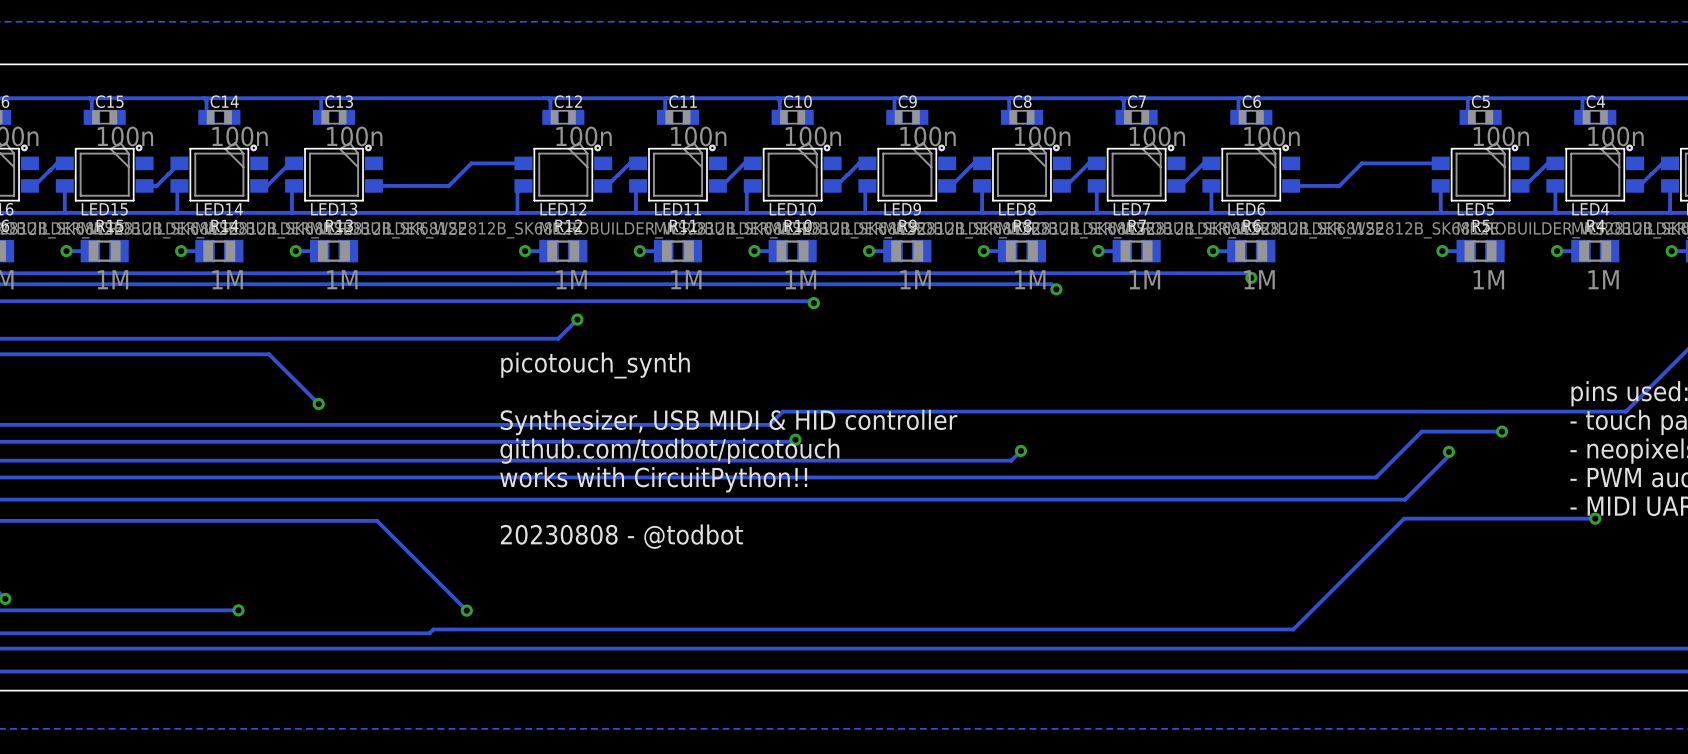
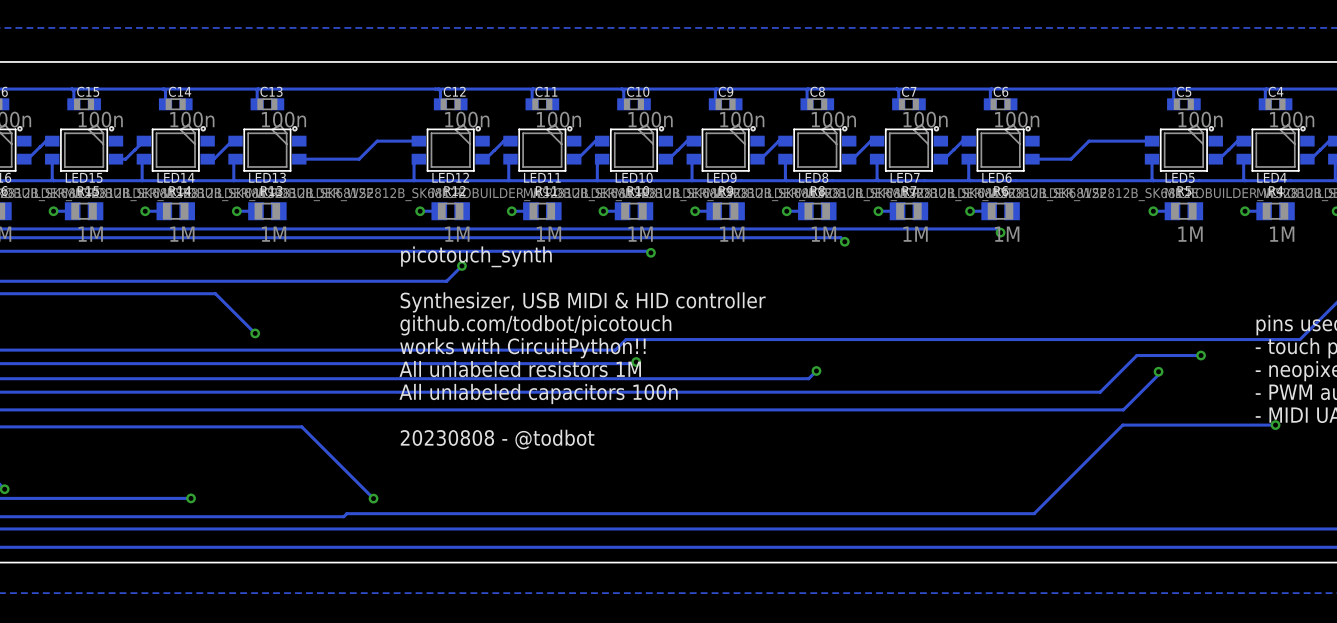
text: none -> picotouch_synth (476, 256)
text: picotouch_synth (595, 365) -> Synthesizer, USB MIDI & HID controller (583, 302)
text: none -> github.com/todbot/picotouch (535, 325)
text: Synthesizer, USB MIDI & HID controller (729, 422) -> works with CircuitPython!! (522, 348)
text: github.com/todbot/picotouch (669, 451) -> All unlabeled resistors 1M (520, 369)
text: works with CircuitPython!! (653, 479) -> All unlabeled capacitors 100n (538, 394)

